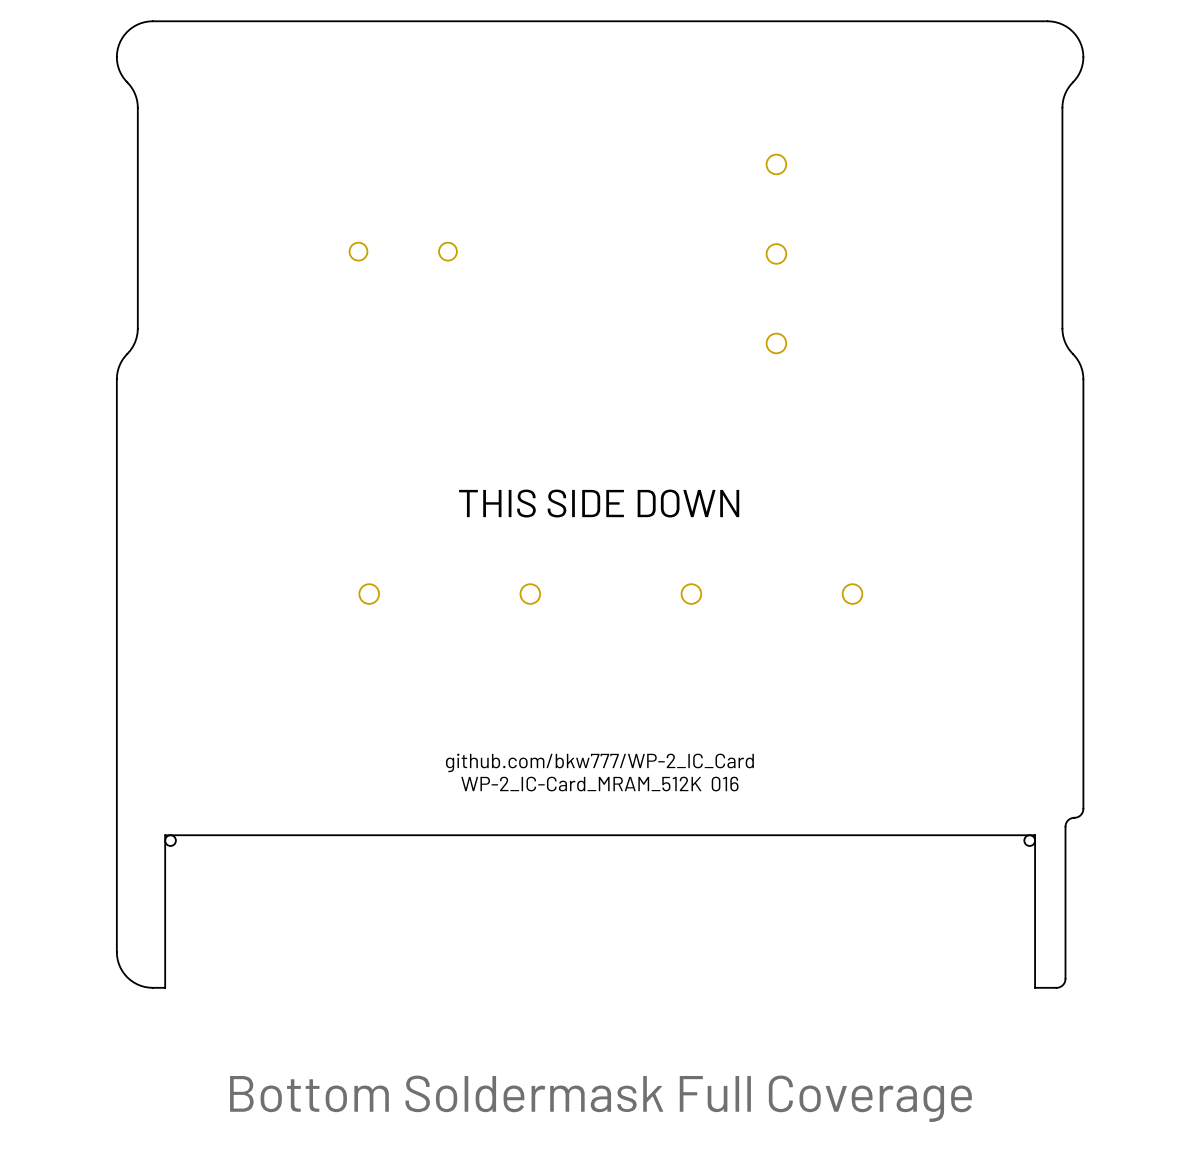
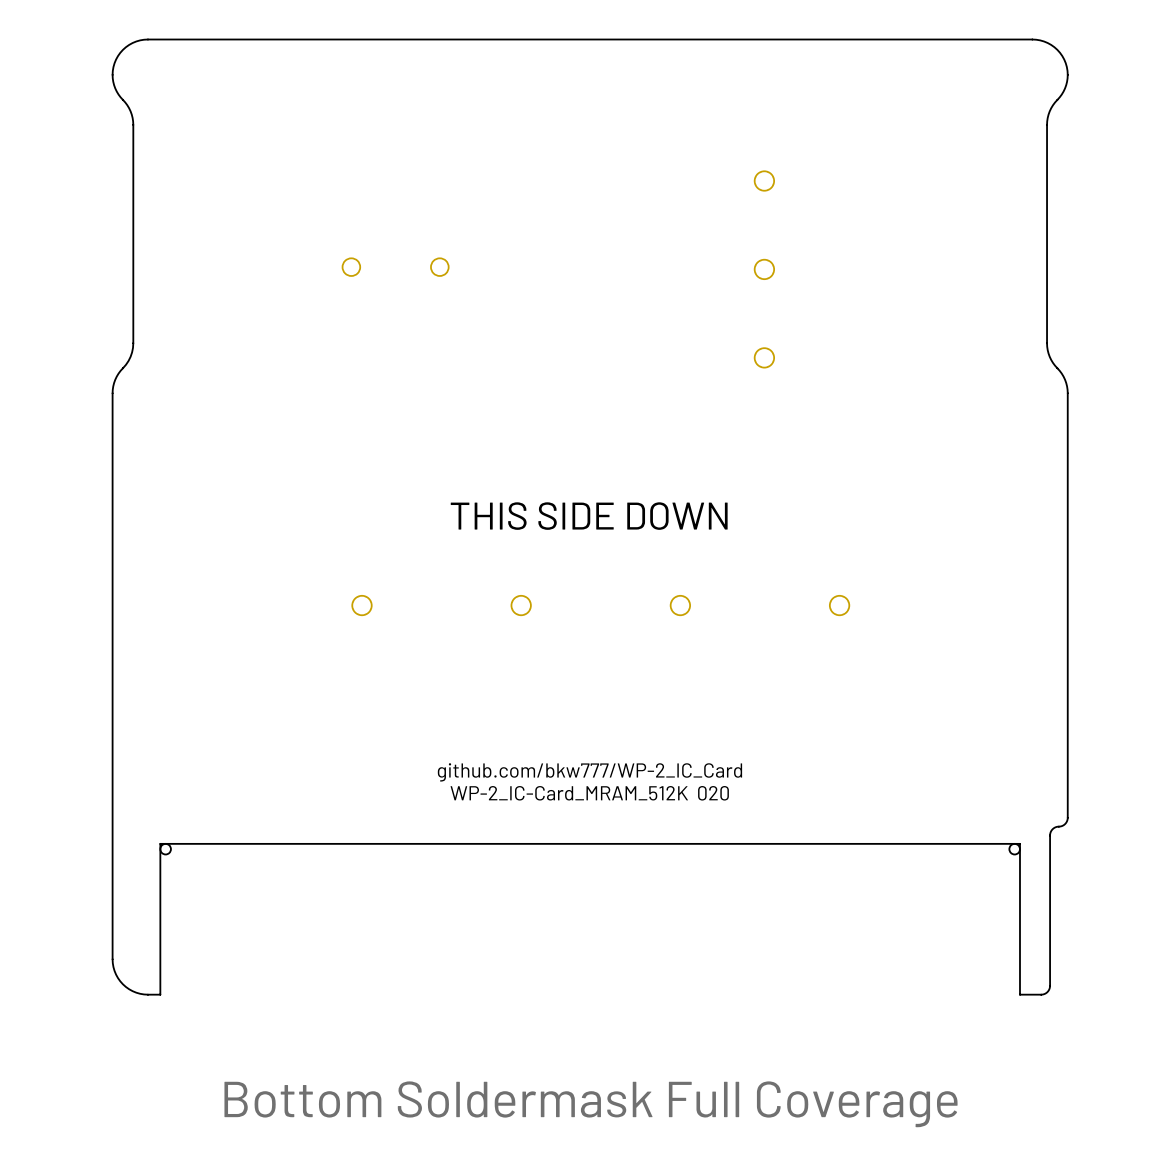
text: WP-2_IC-Card_MRAM_512K 016 (599, 784) -> WP-2_IC-Card_MRAM_512K 020 (589, 793)

